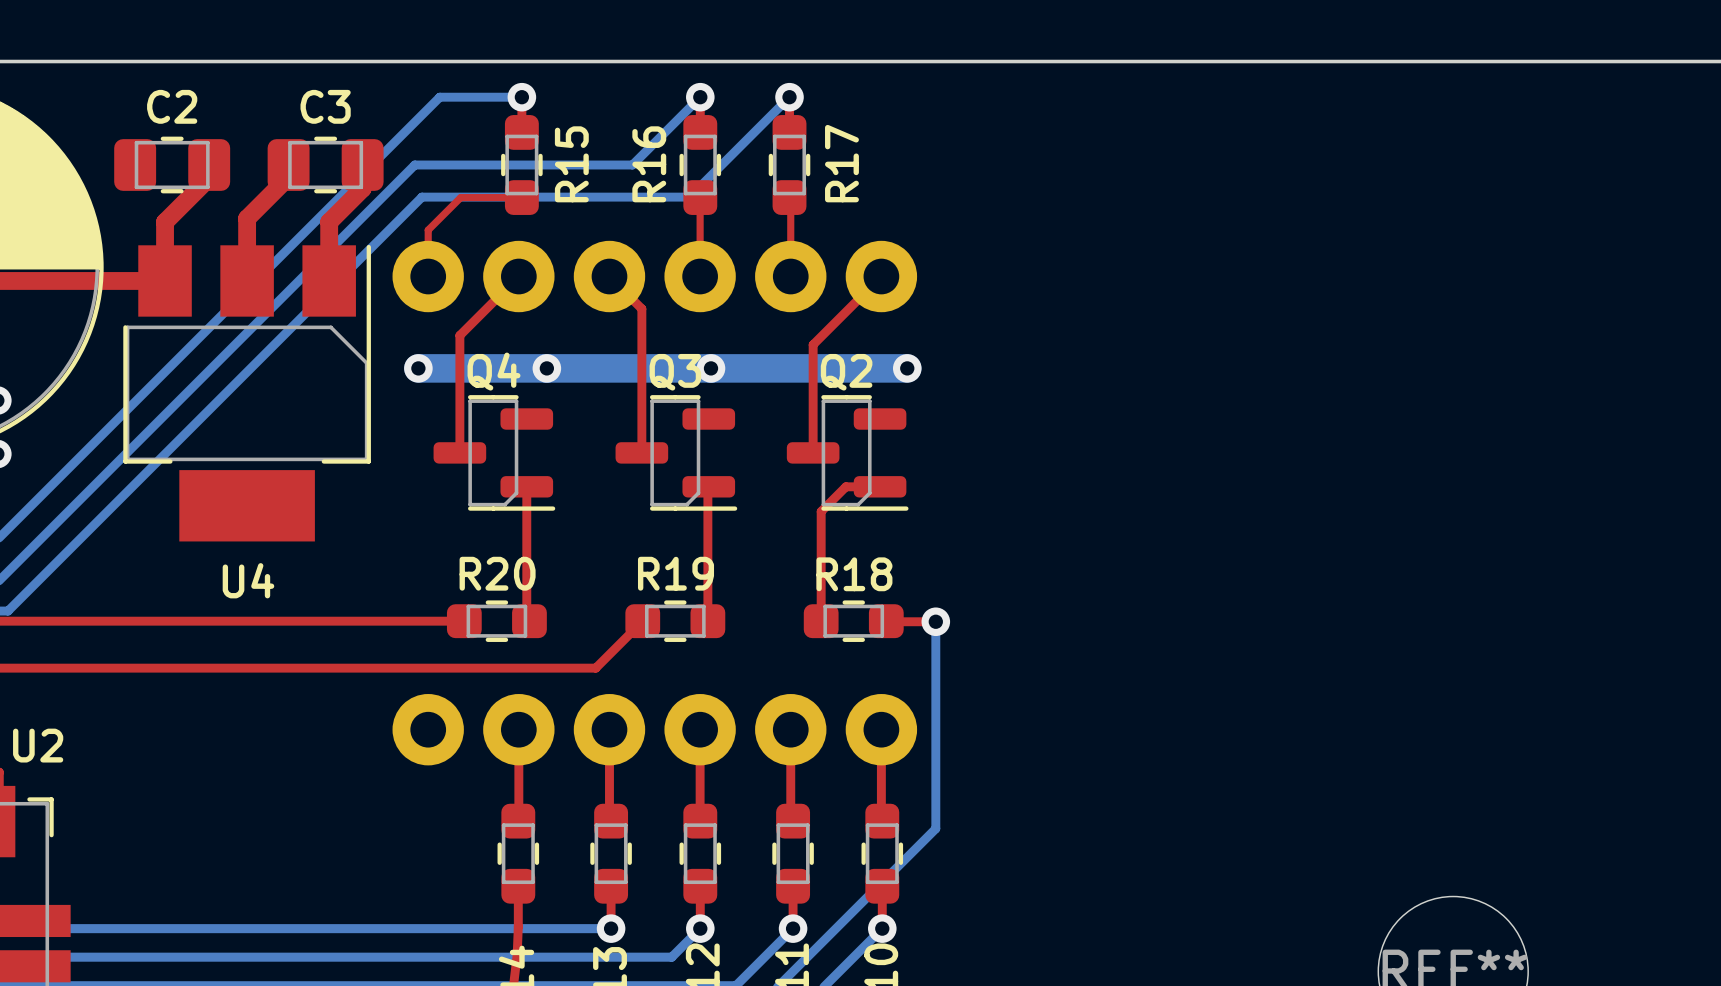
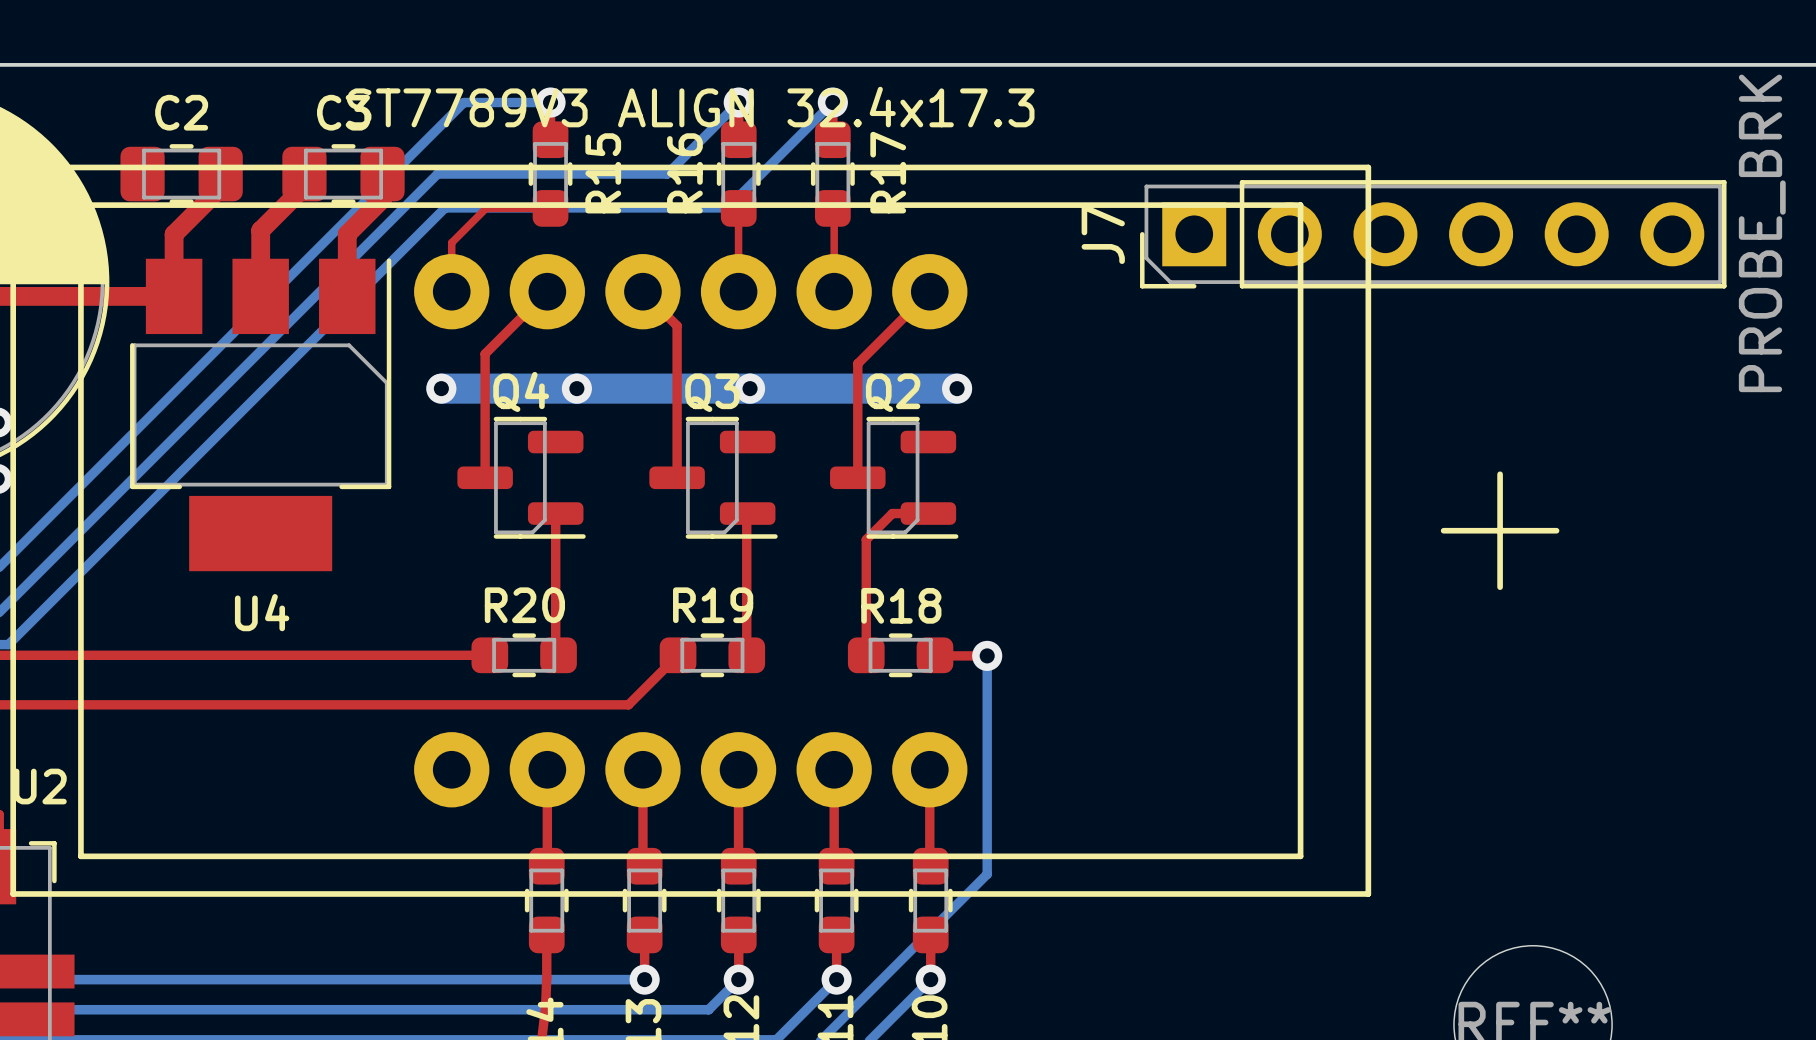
text: none -> ST7789V3 ALIGN 32.4x17.3 (690, 107)
line: none -> (13, 167) (1368, 167) (1368, 893) (13, 893) (13, 167)
line: none -> (80, 205) (1300, 205) (1300, 856) (80, 856) (80, 205)
J7: none -> PROBE_BRK (1433, 234)
line: none -> (1500, 474) (1500, 587)
line: none -> (1443, 530) (1556, 530)

